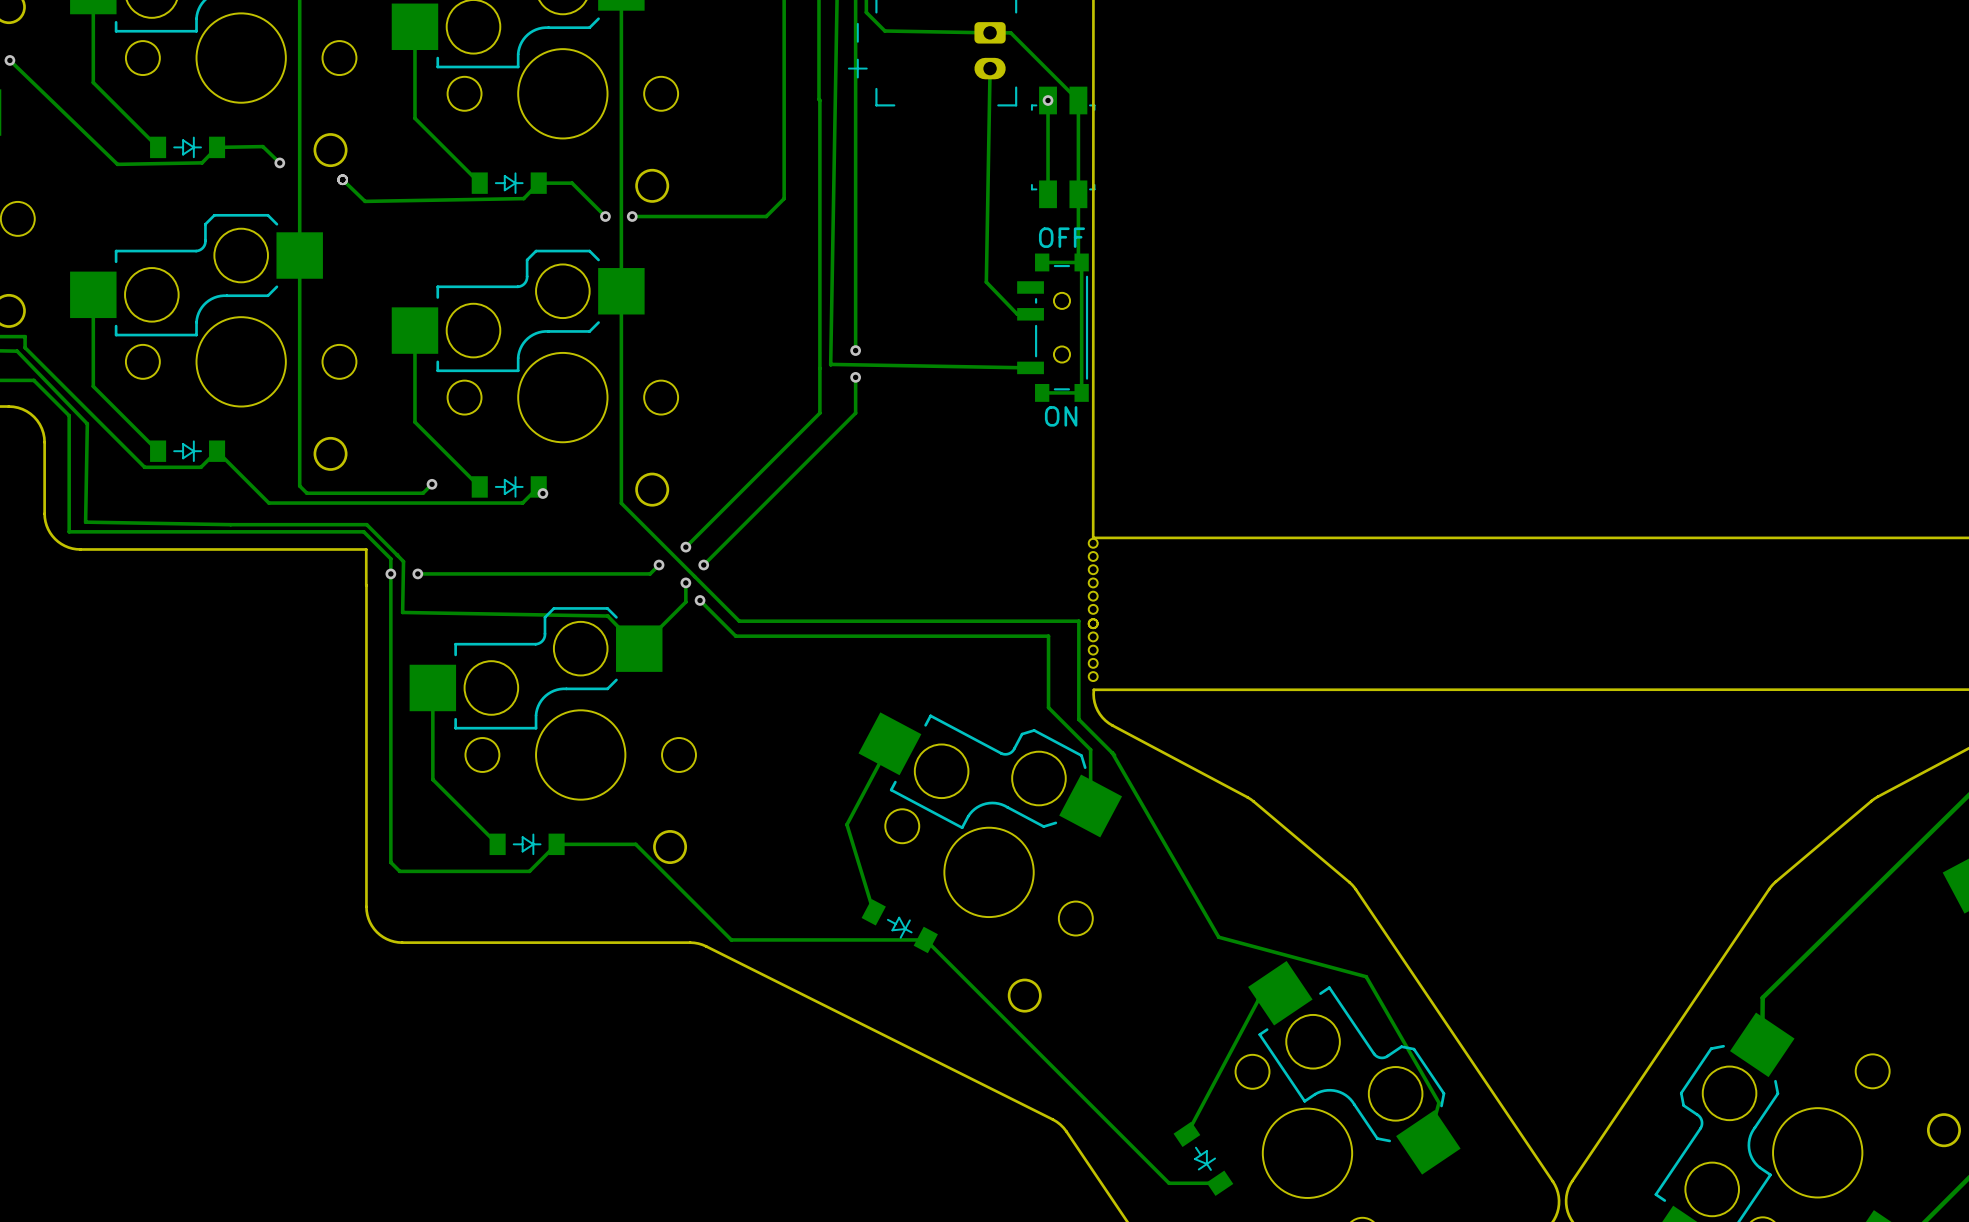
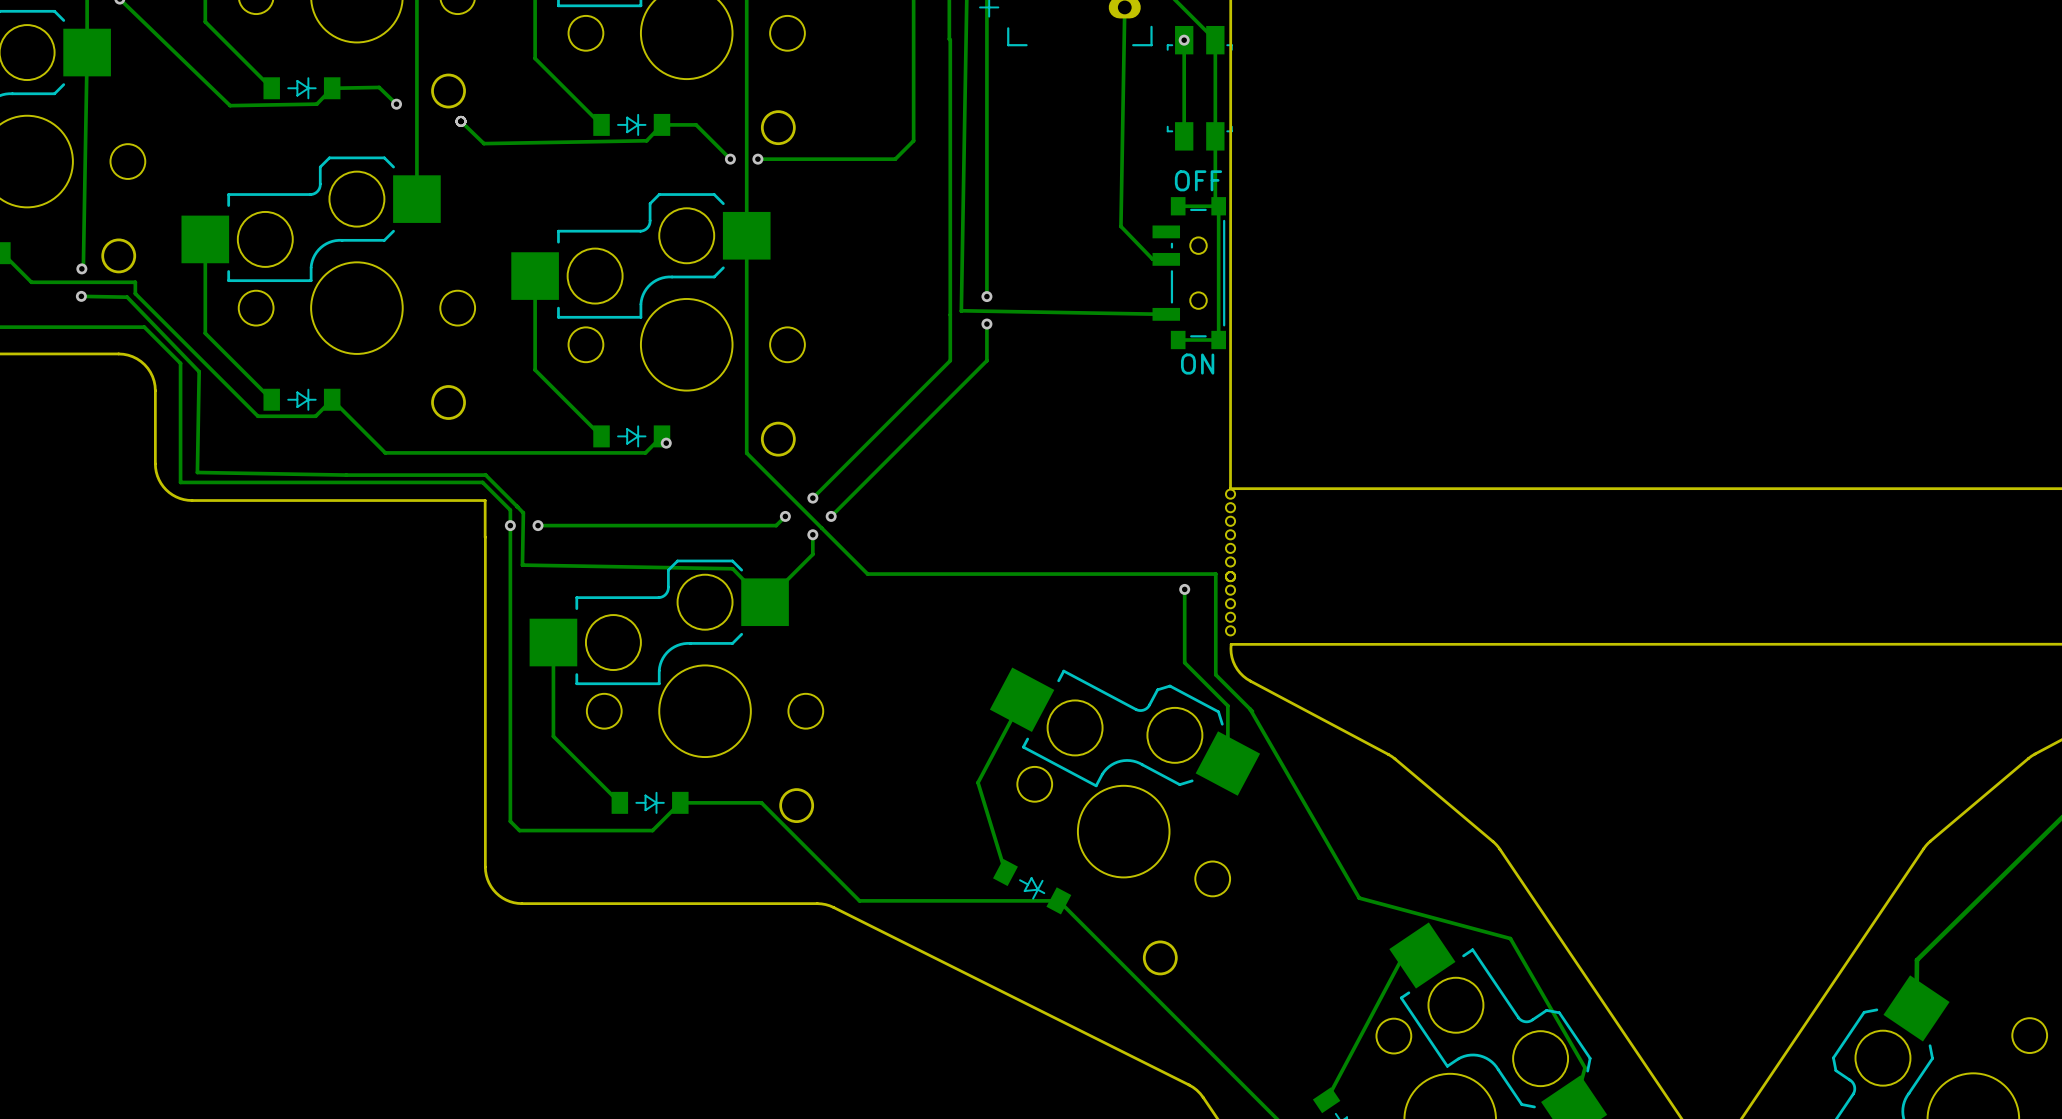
track: (299, 255) (299, 486) (306, 493) (423, 493) (432, 484) -> none
via: (432, 484) -> none
track: (700, 600) (735, 636) (1048, 636) -> none
via: (700, 600) -> none
via: none -> (1184, 589)

